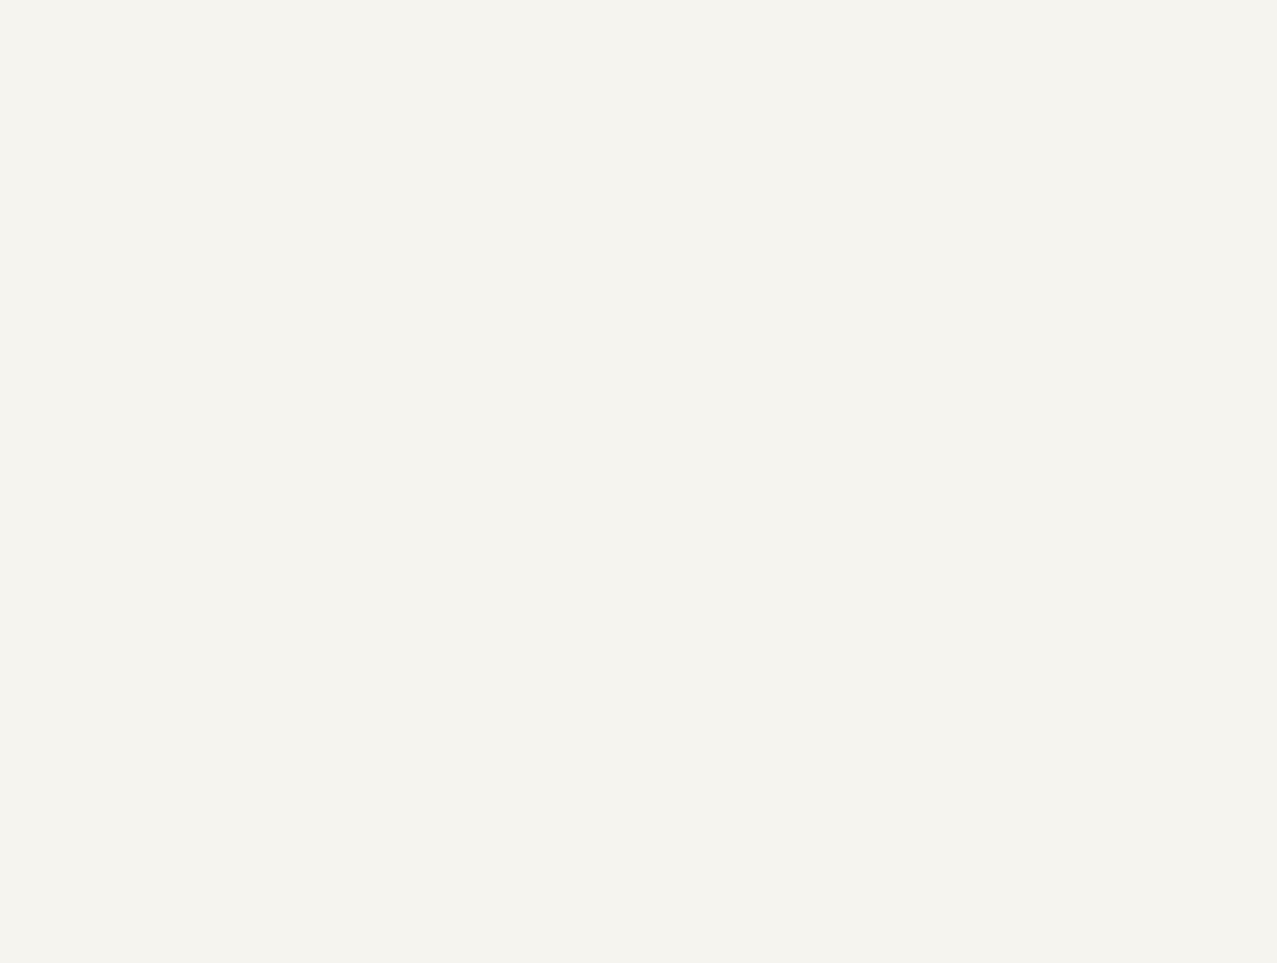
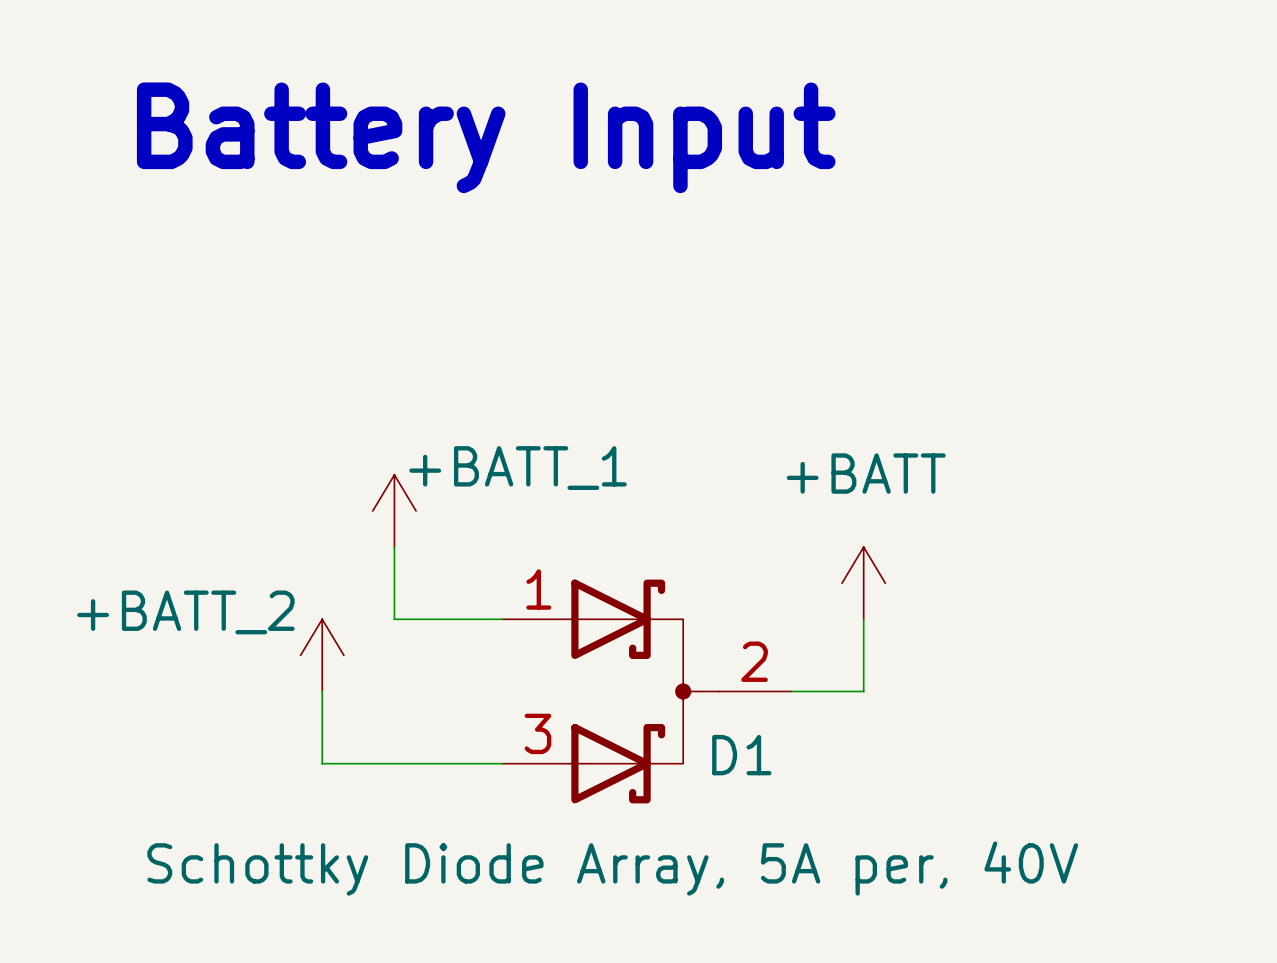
text: none -> Battery Input (486, 137)
power symbol: none -> +BATT_1 (394, 511)
wire: none -> (394, 547) (394, 619) (502, 619)
power symbol: none -> +BATT (863, 583)
wire: none -> (863, 619) (863, 691) (791, 691)
power symbol: none -> +BATT_2 (322, 655)
wire: none -> (322, 691) (322, 763) (502, 763)
D1: none -> Schottky Diode Array, 5A per, 40V (647, 691)

